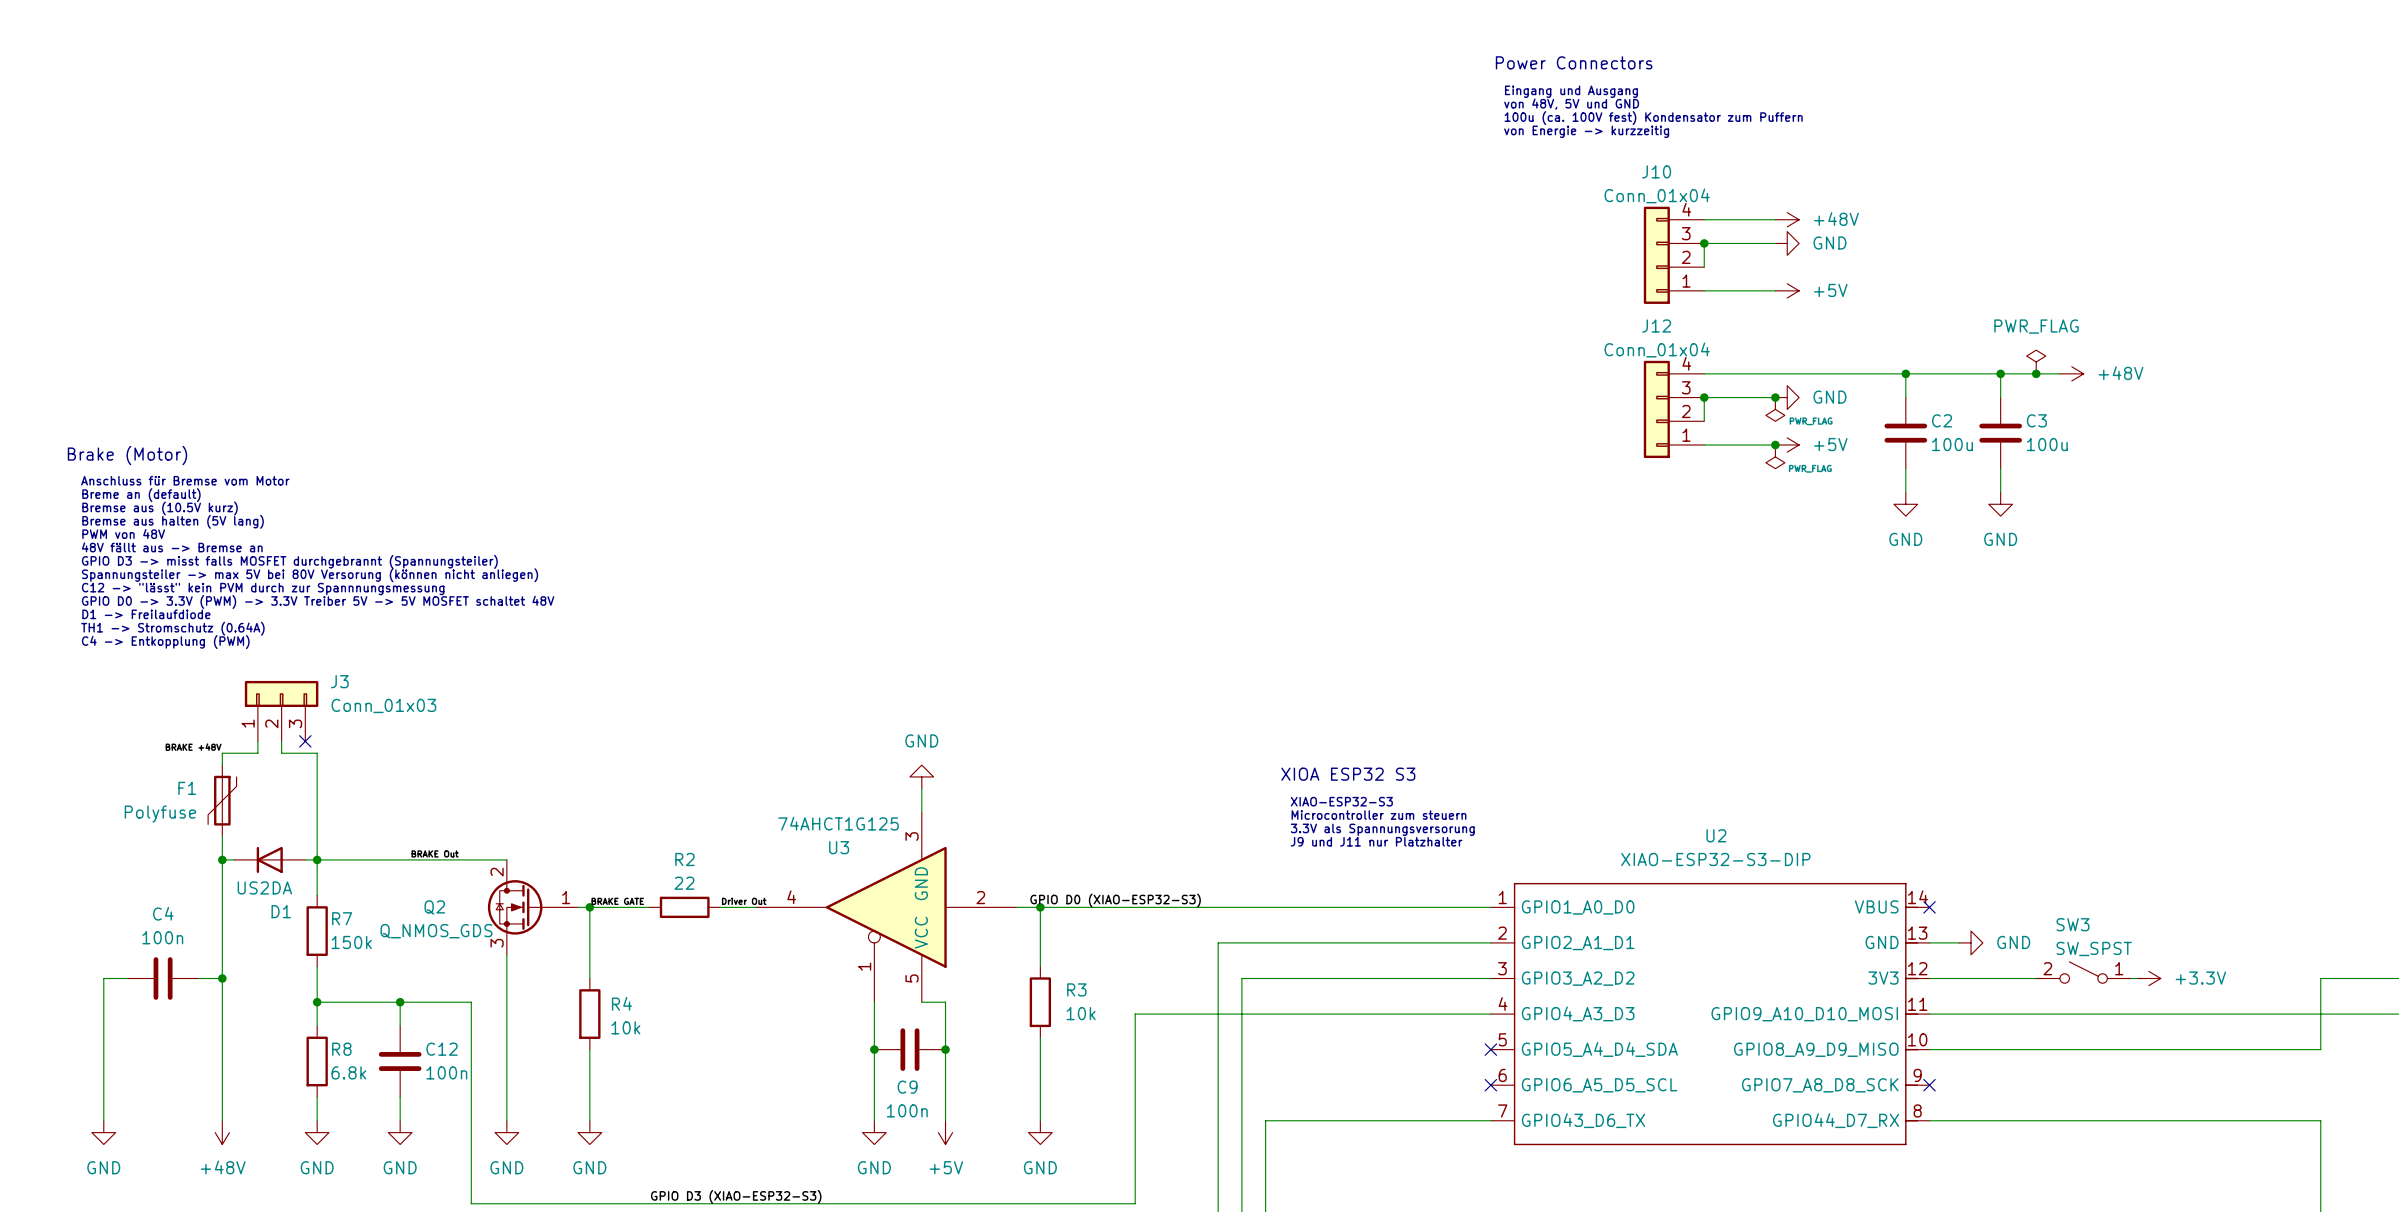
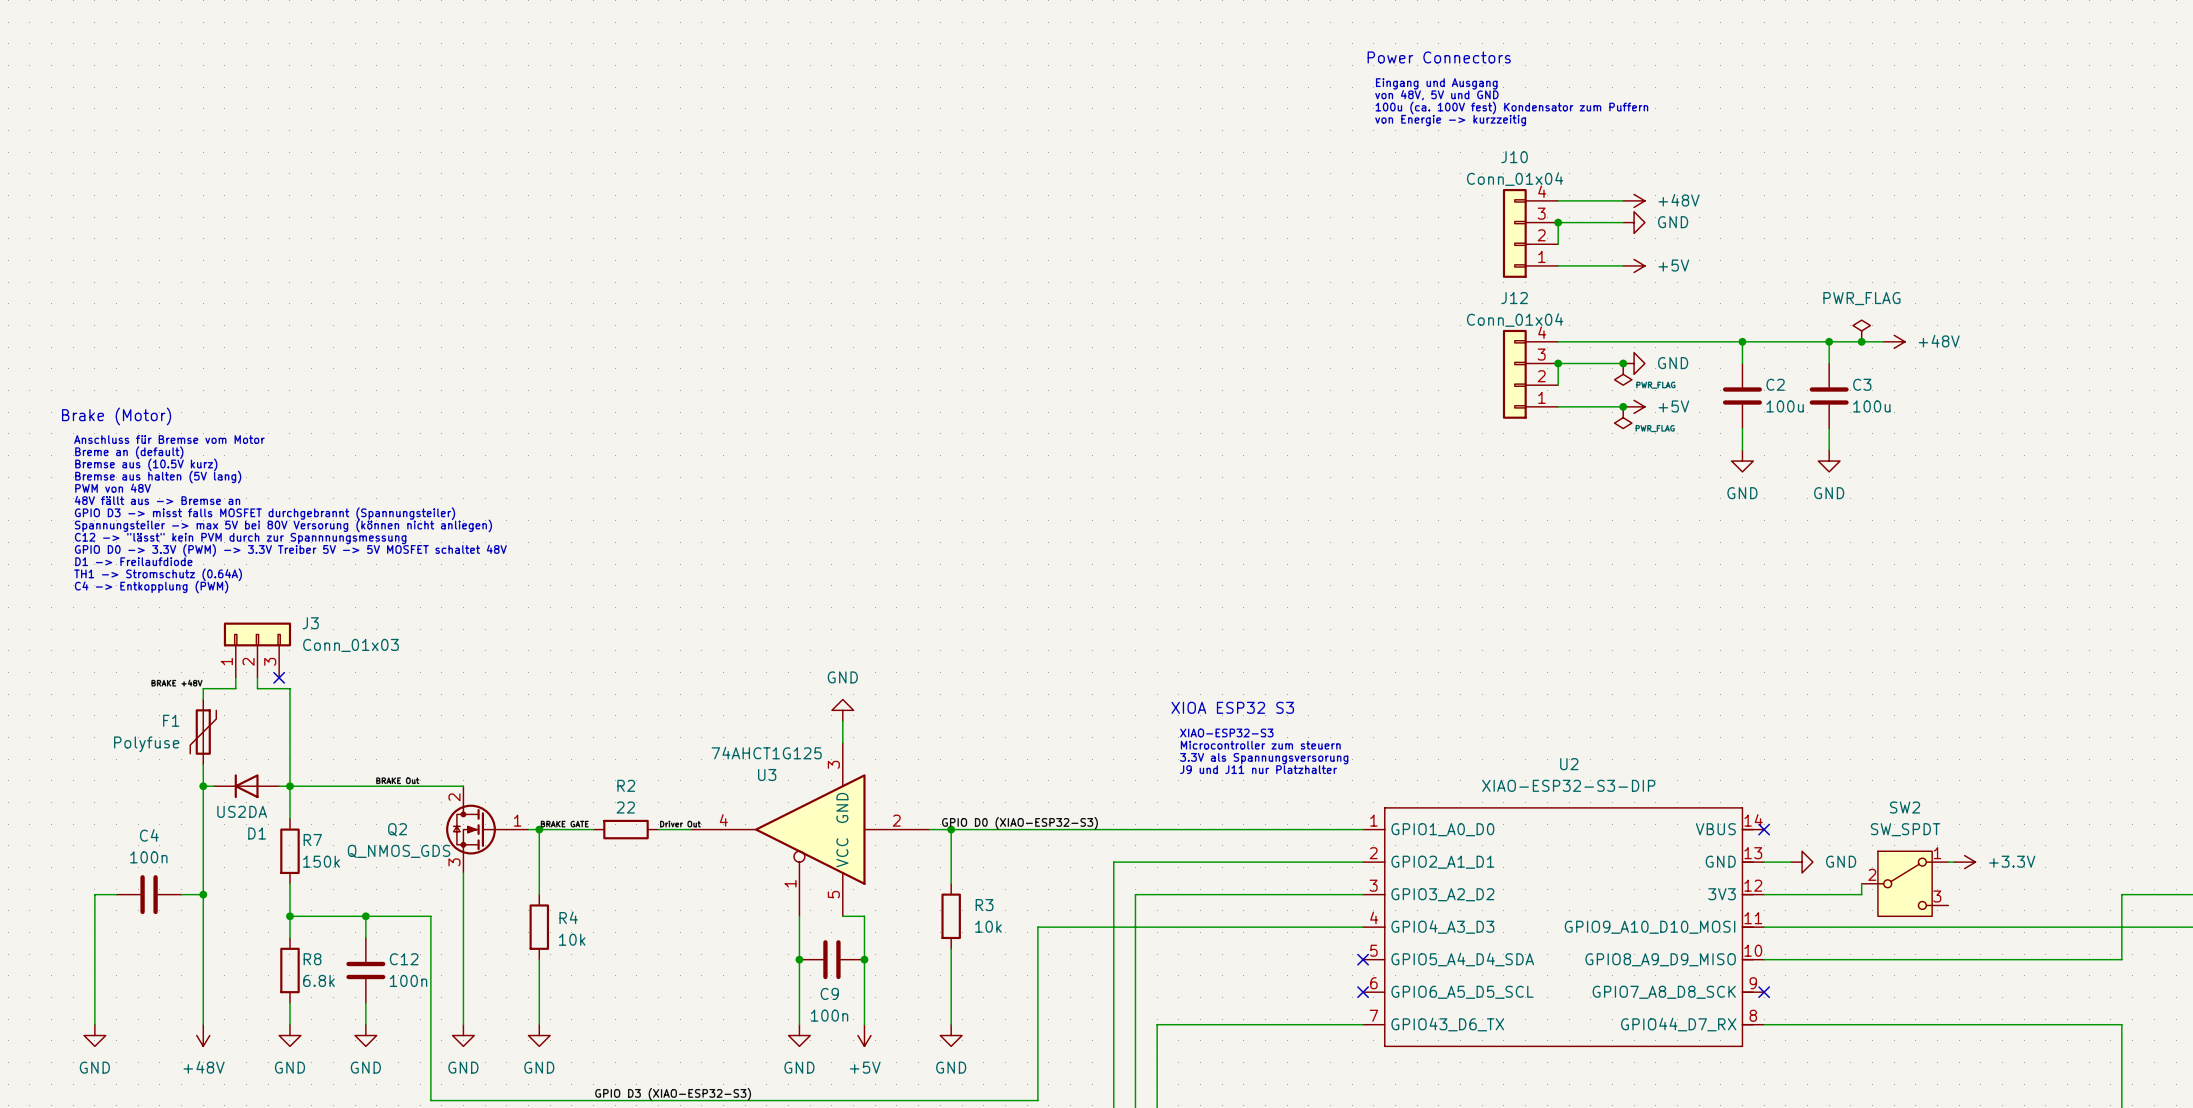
wire: none -> (1861, 883) (1861, 894)
SW2: none -> SW_SPDT (1905, 883)
SW3: SW_SPST (2083, 972) -> none
wire: (2131, 978) (2136, 978) -> (1948, 862) (1953, 862)
power symbol position: +3.3V (2148, 978) -> +3.3V (1964, 862)

